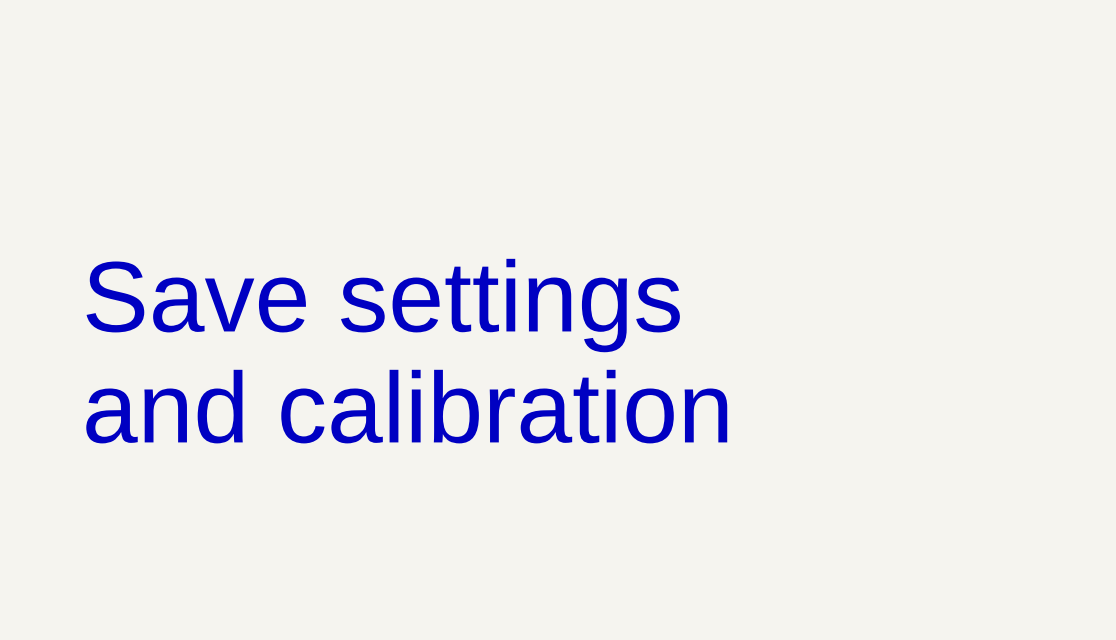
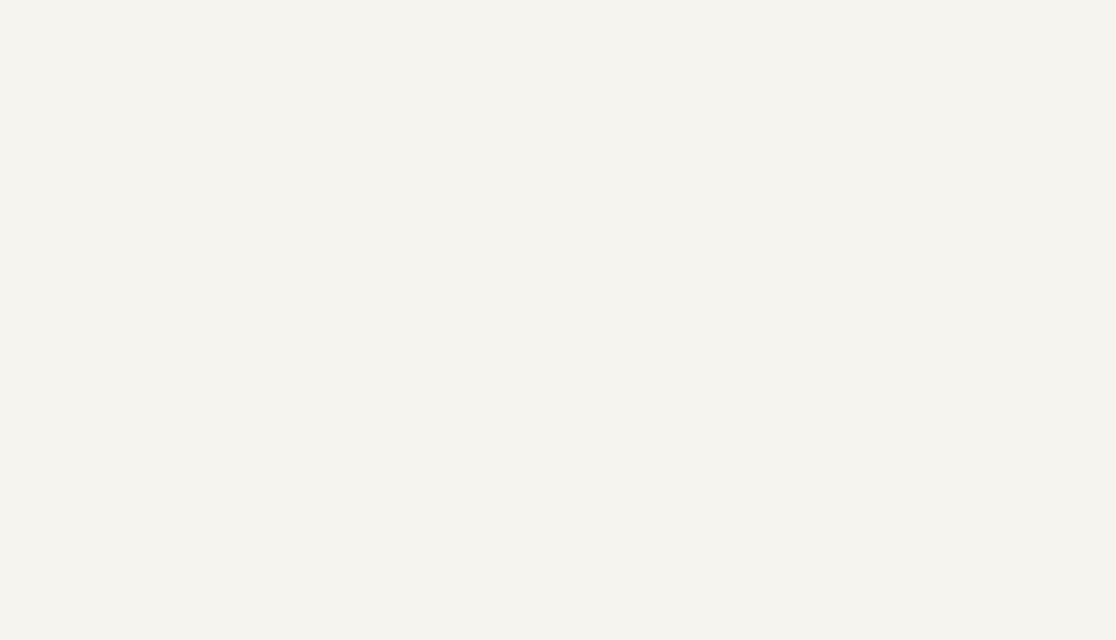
text: Save settings (383, 305) -> none
text: and calibration (406, 406) -> none

